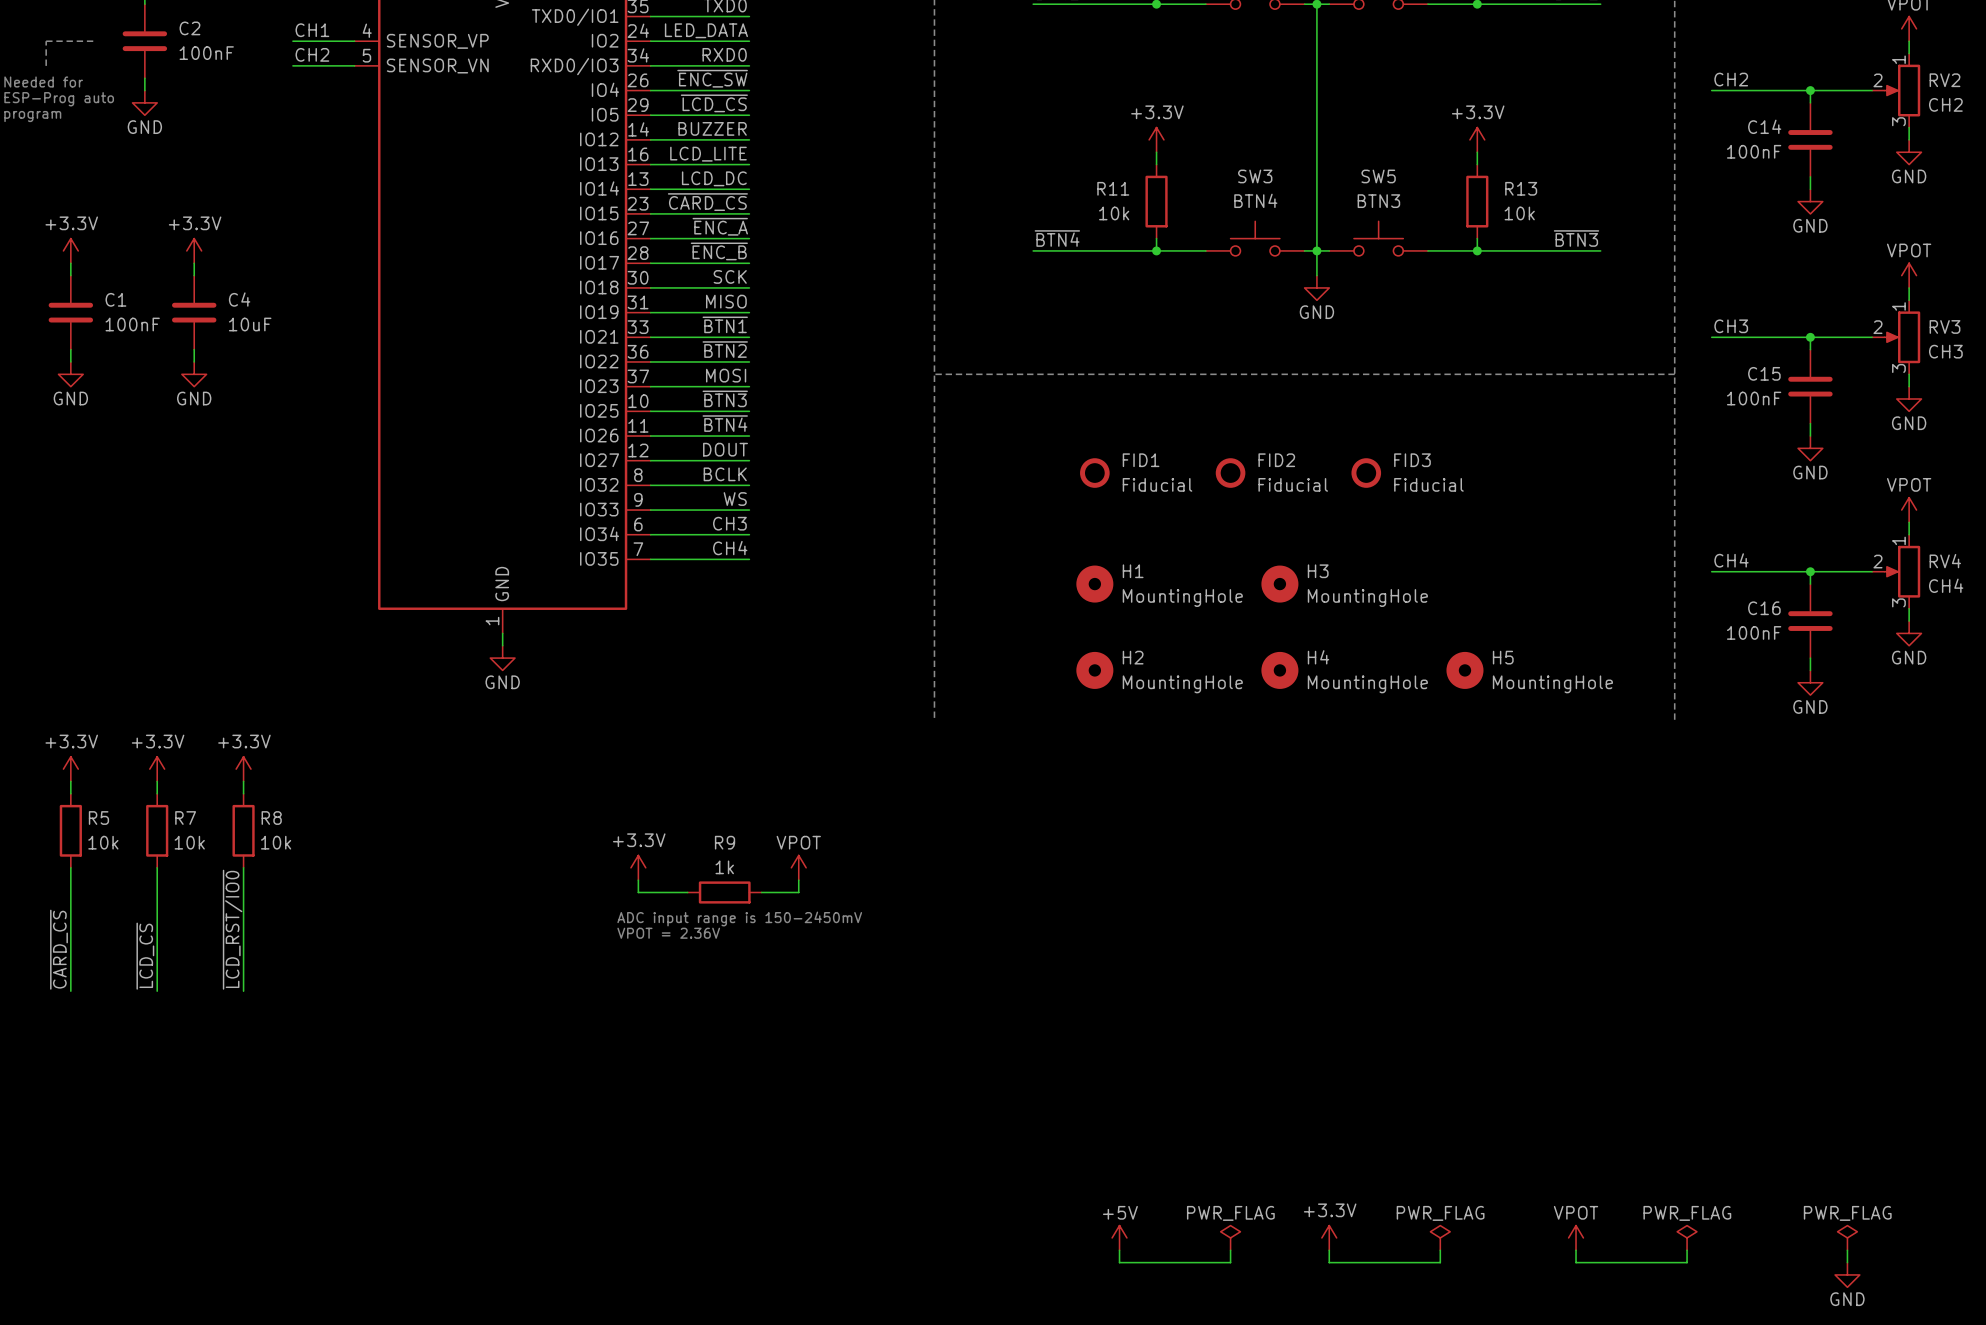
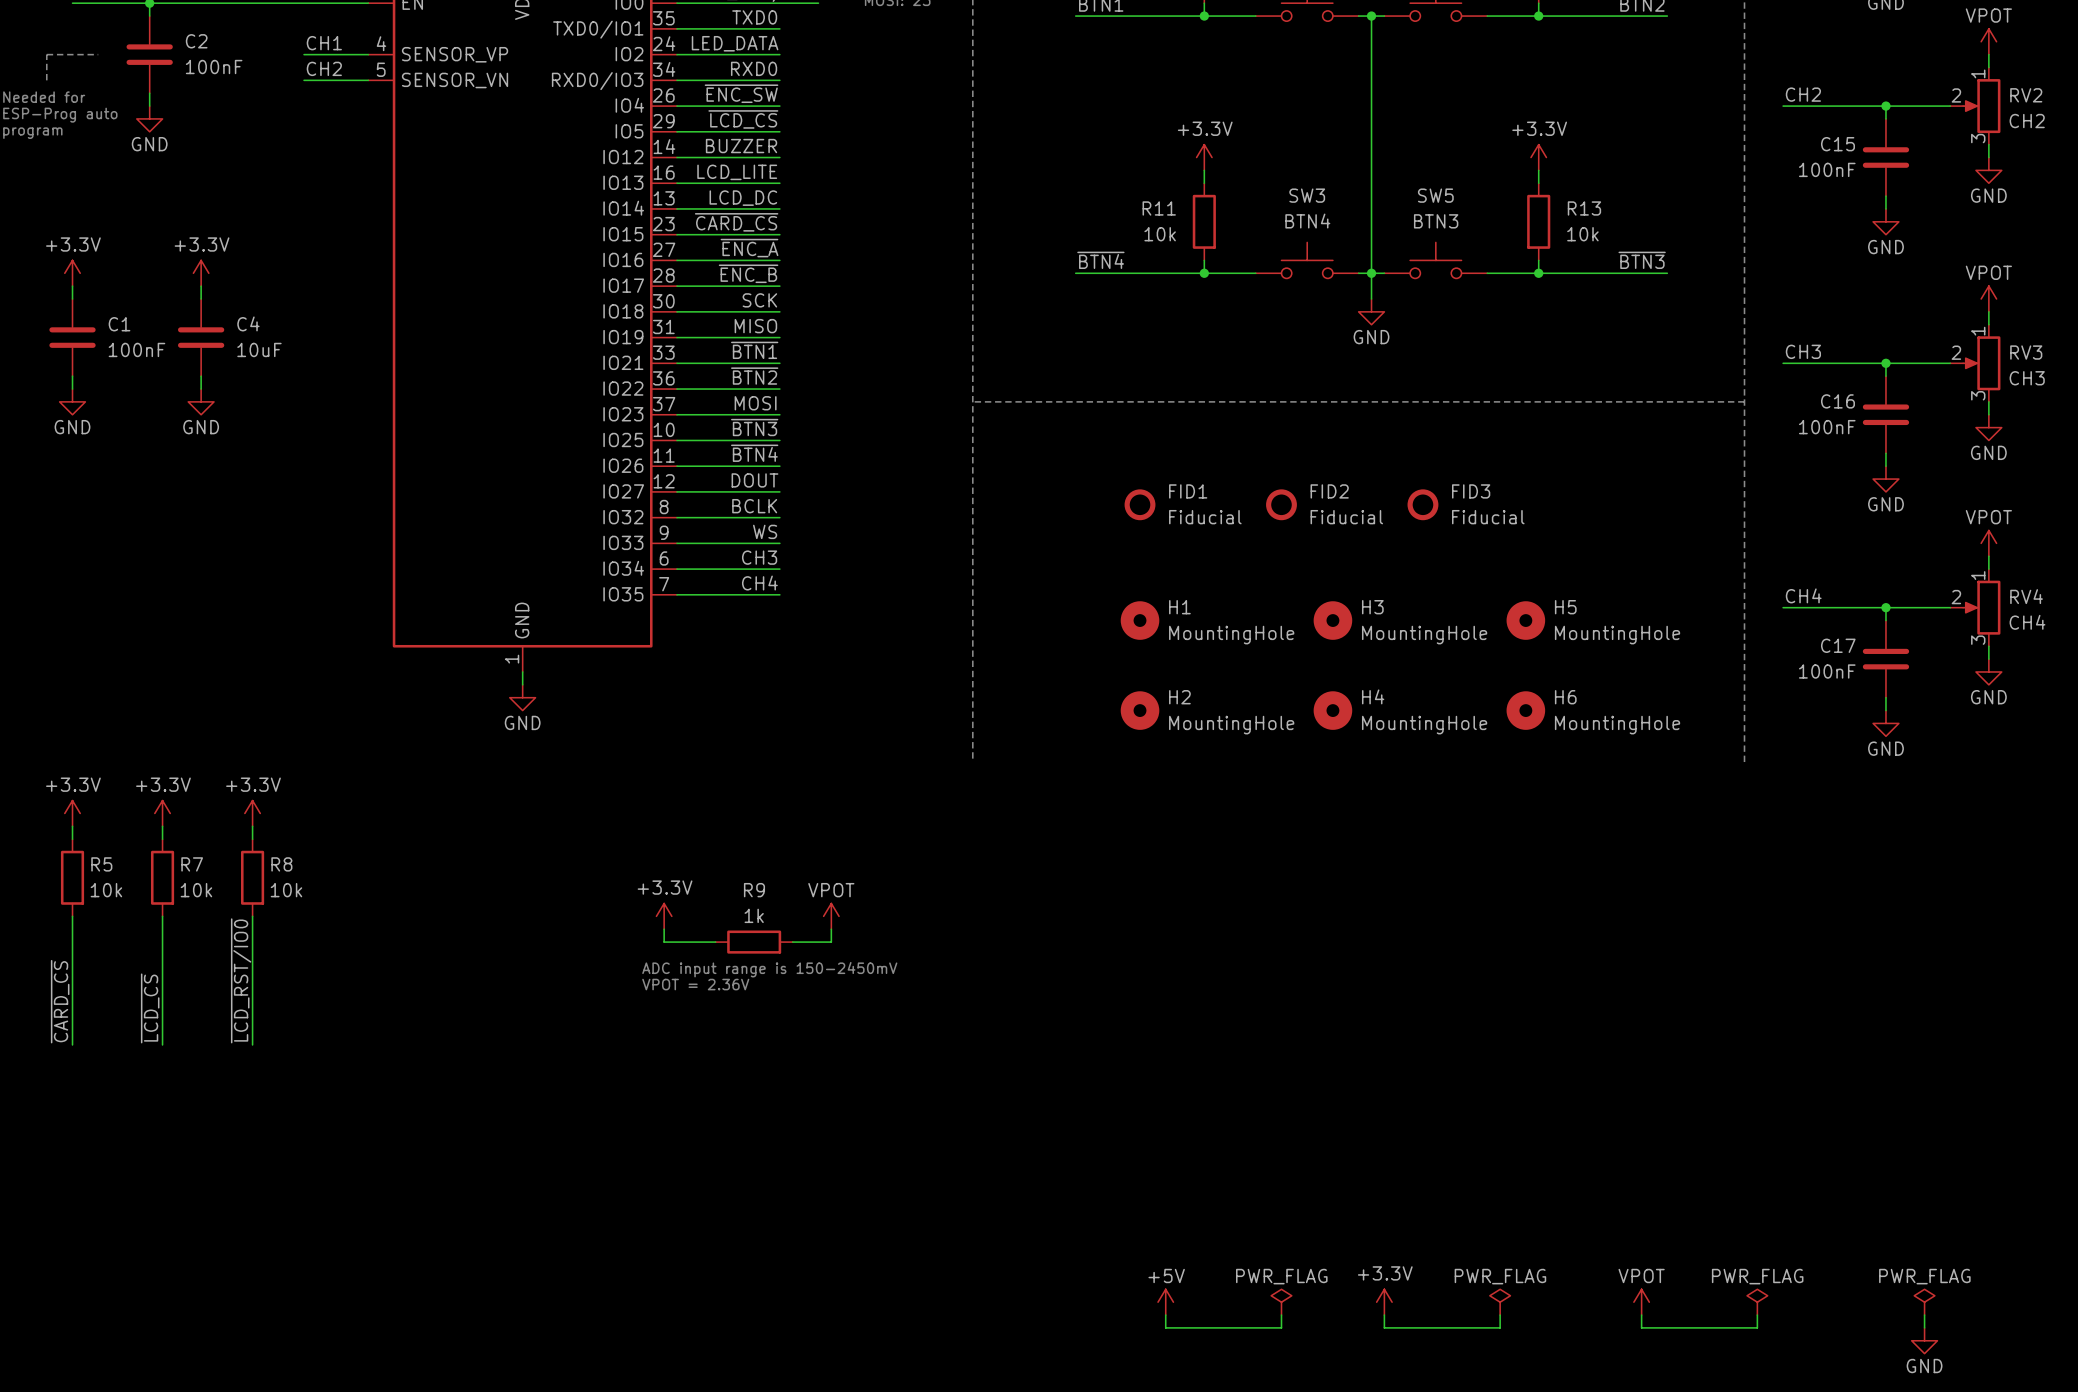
C14 name: C14 (1764, 126) -> C15 (1837, 144)
C15 name: C15 (1764, 373) -> C16 (1837, 401)
H5: none -> MountingHole (1525, 620)
C16 name: C16 (1764, 608) -> C17 (1838, 645)
H5 name: H5 (1503, 657) -> H6 (1565, 697)

